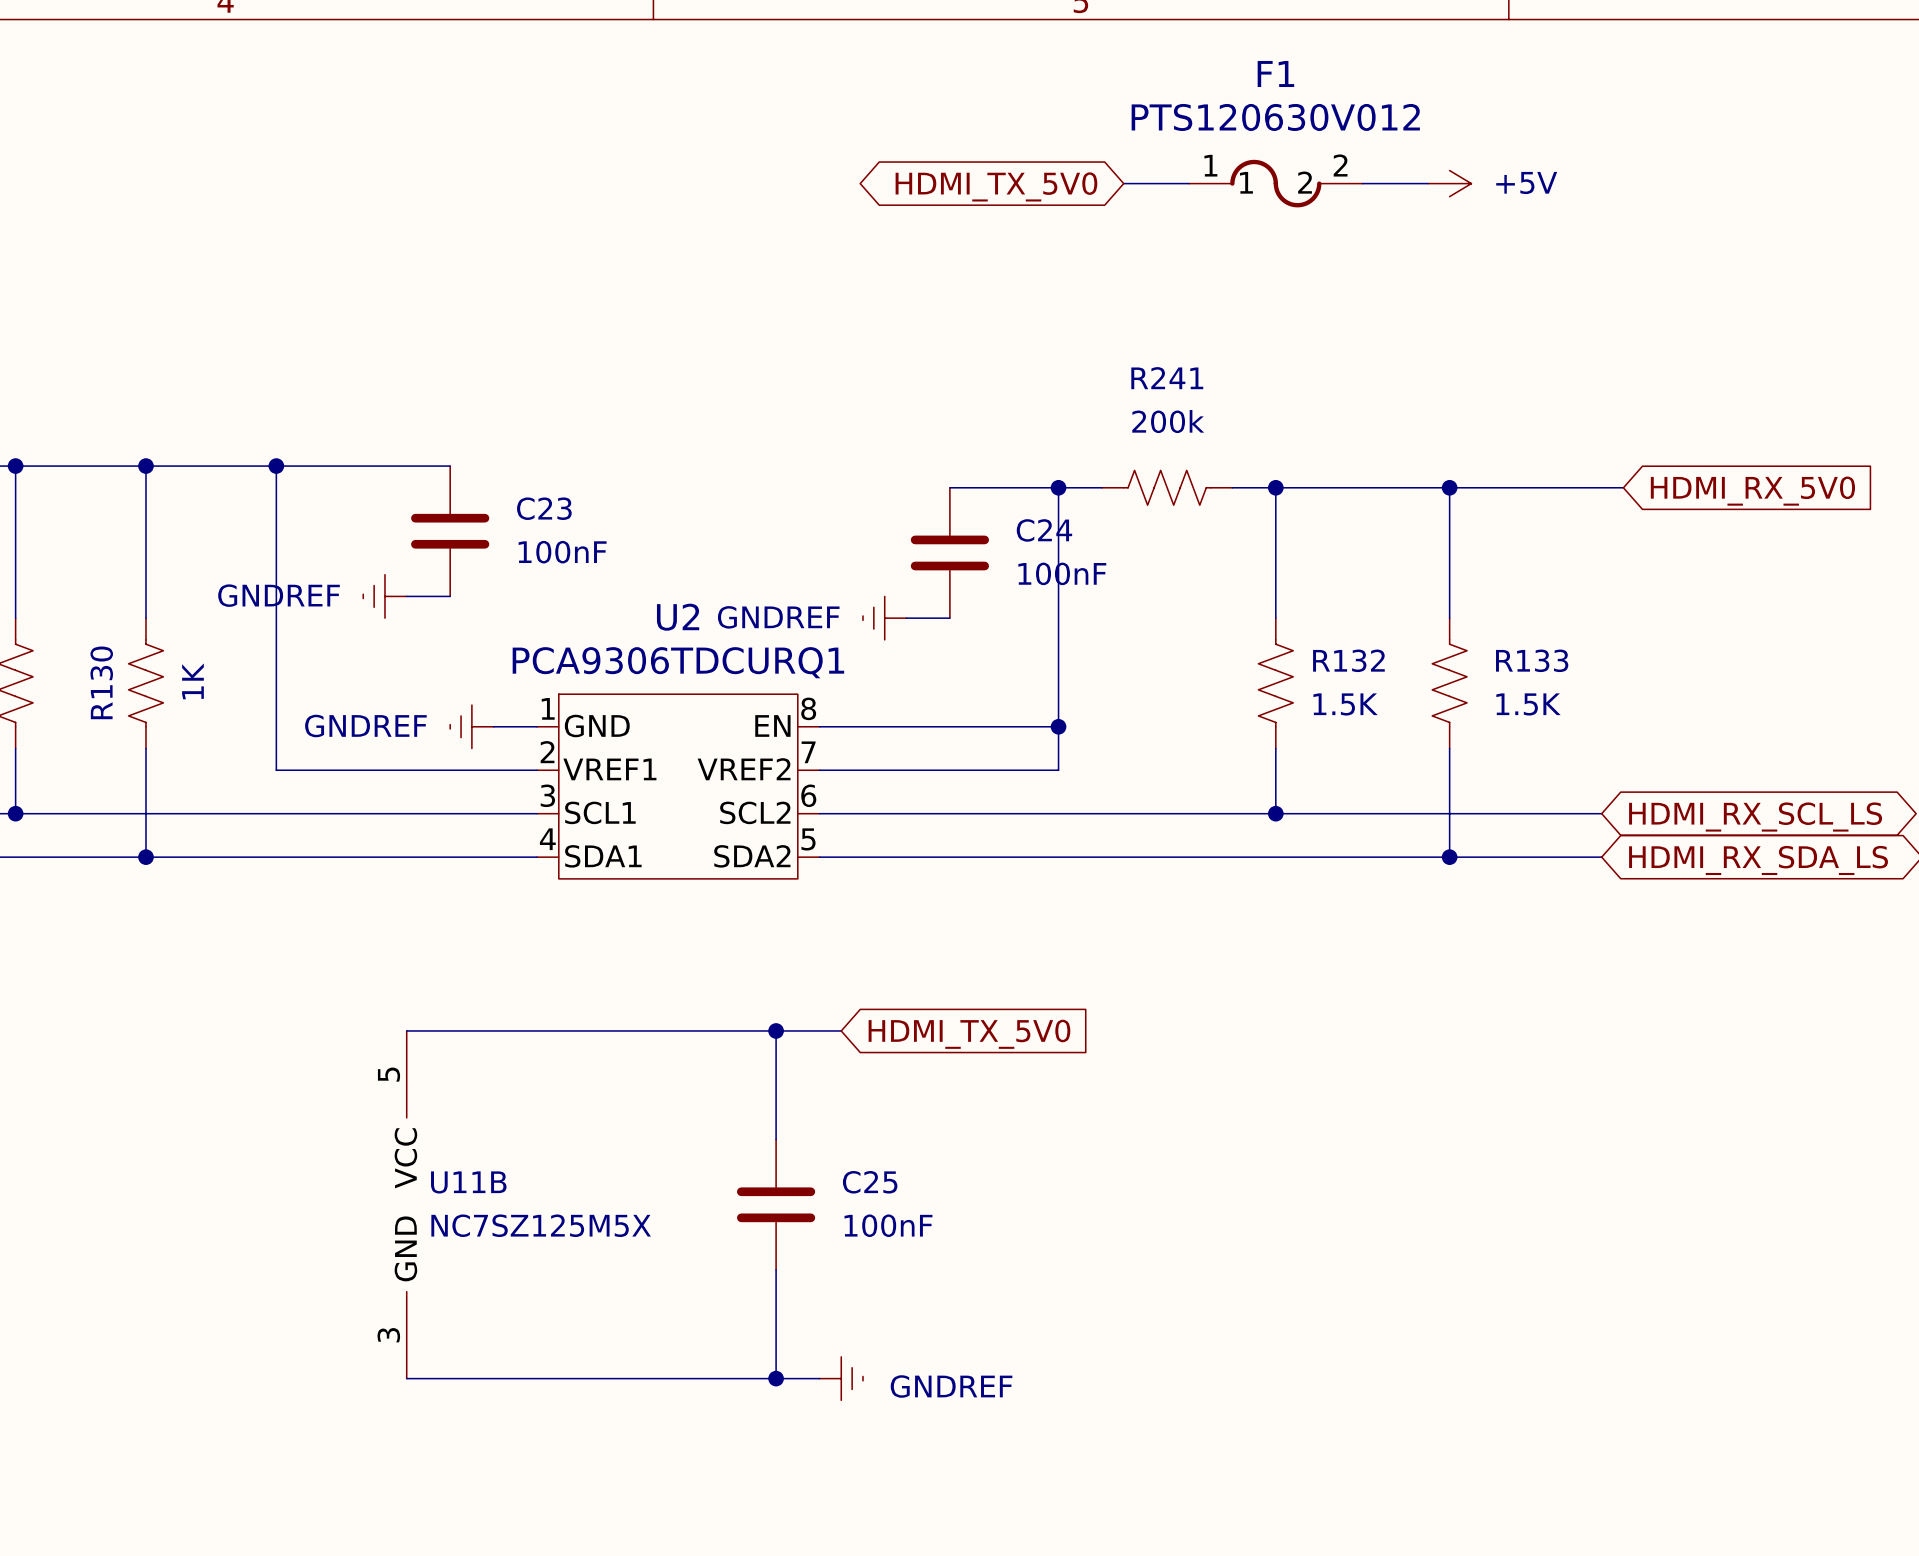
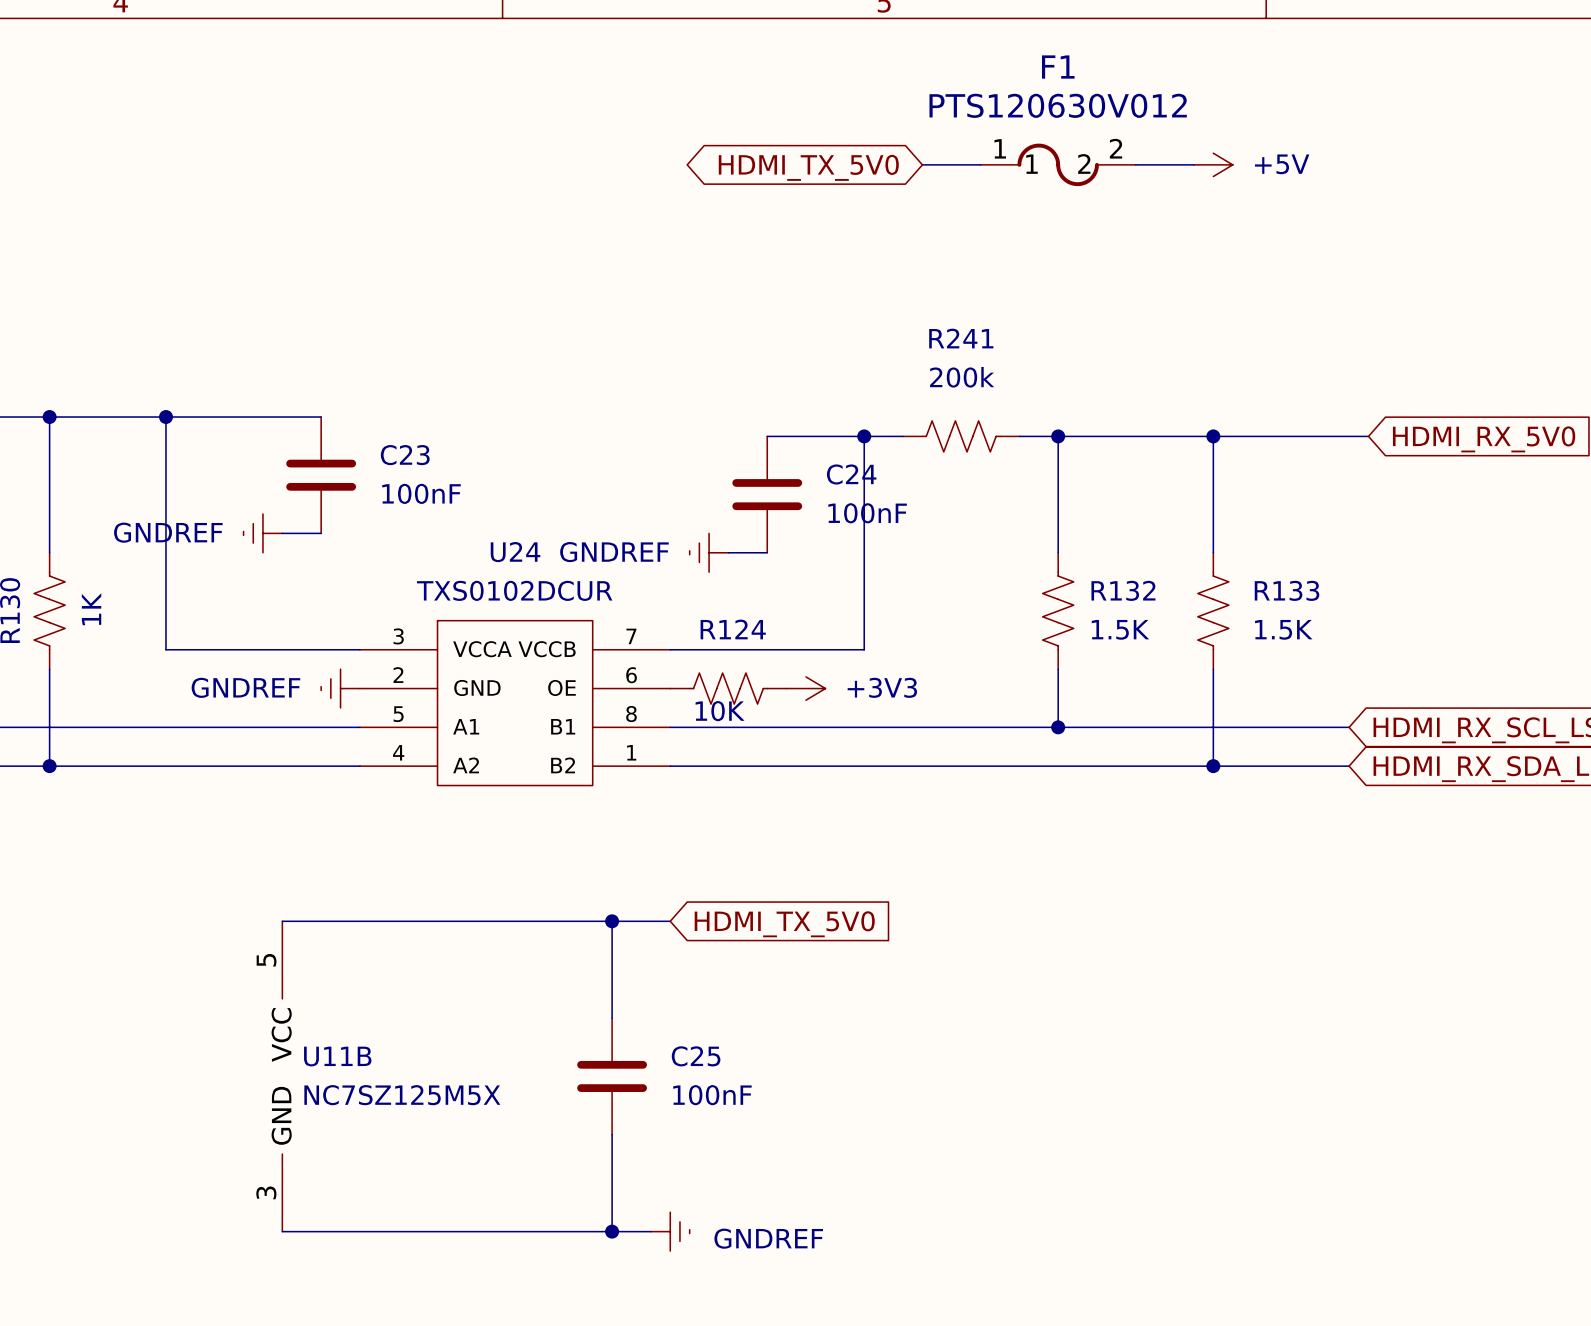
wire: (276, 726) (276, 770) (537, 770) -> (165, 649) (359, 649)
power symbol position: GNDREF (471, 726) -> GNDREF (340, 688)
wire: (1058, 726) (1058, 770) (819, 770) -> none
junction: (1058, 726) -> none
R124: none -> 10K (728, 688)
power symbol: none -> +3V3 (806, 688)
U24: none -> TXS0102DCUR (515, 703)
U2: PCA9306TDCURQ1 (678, 786) -> none

